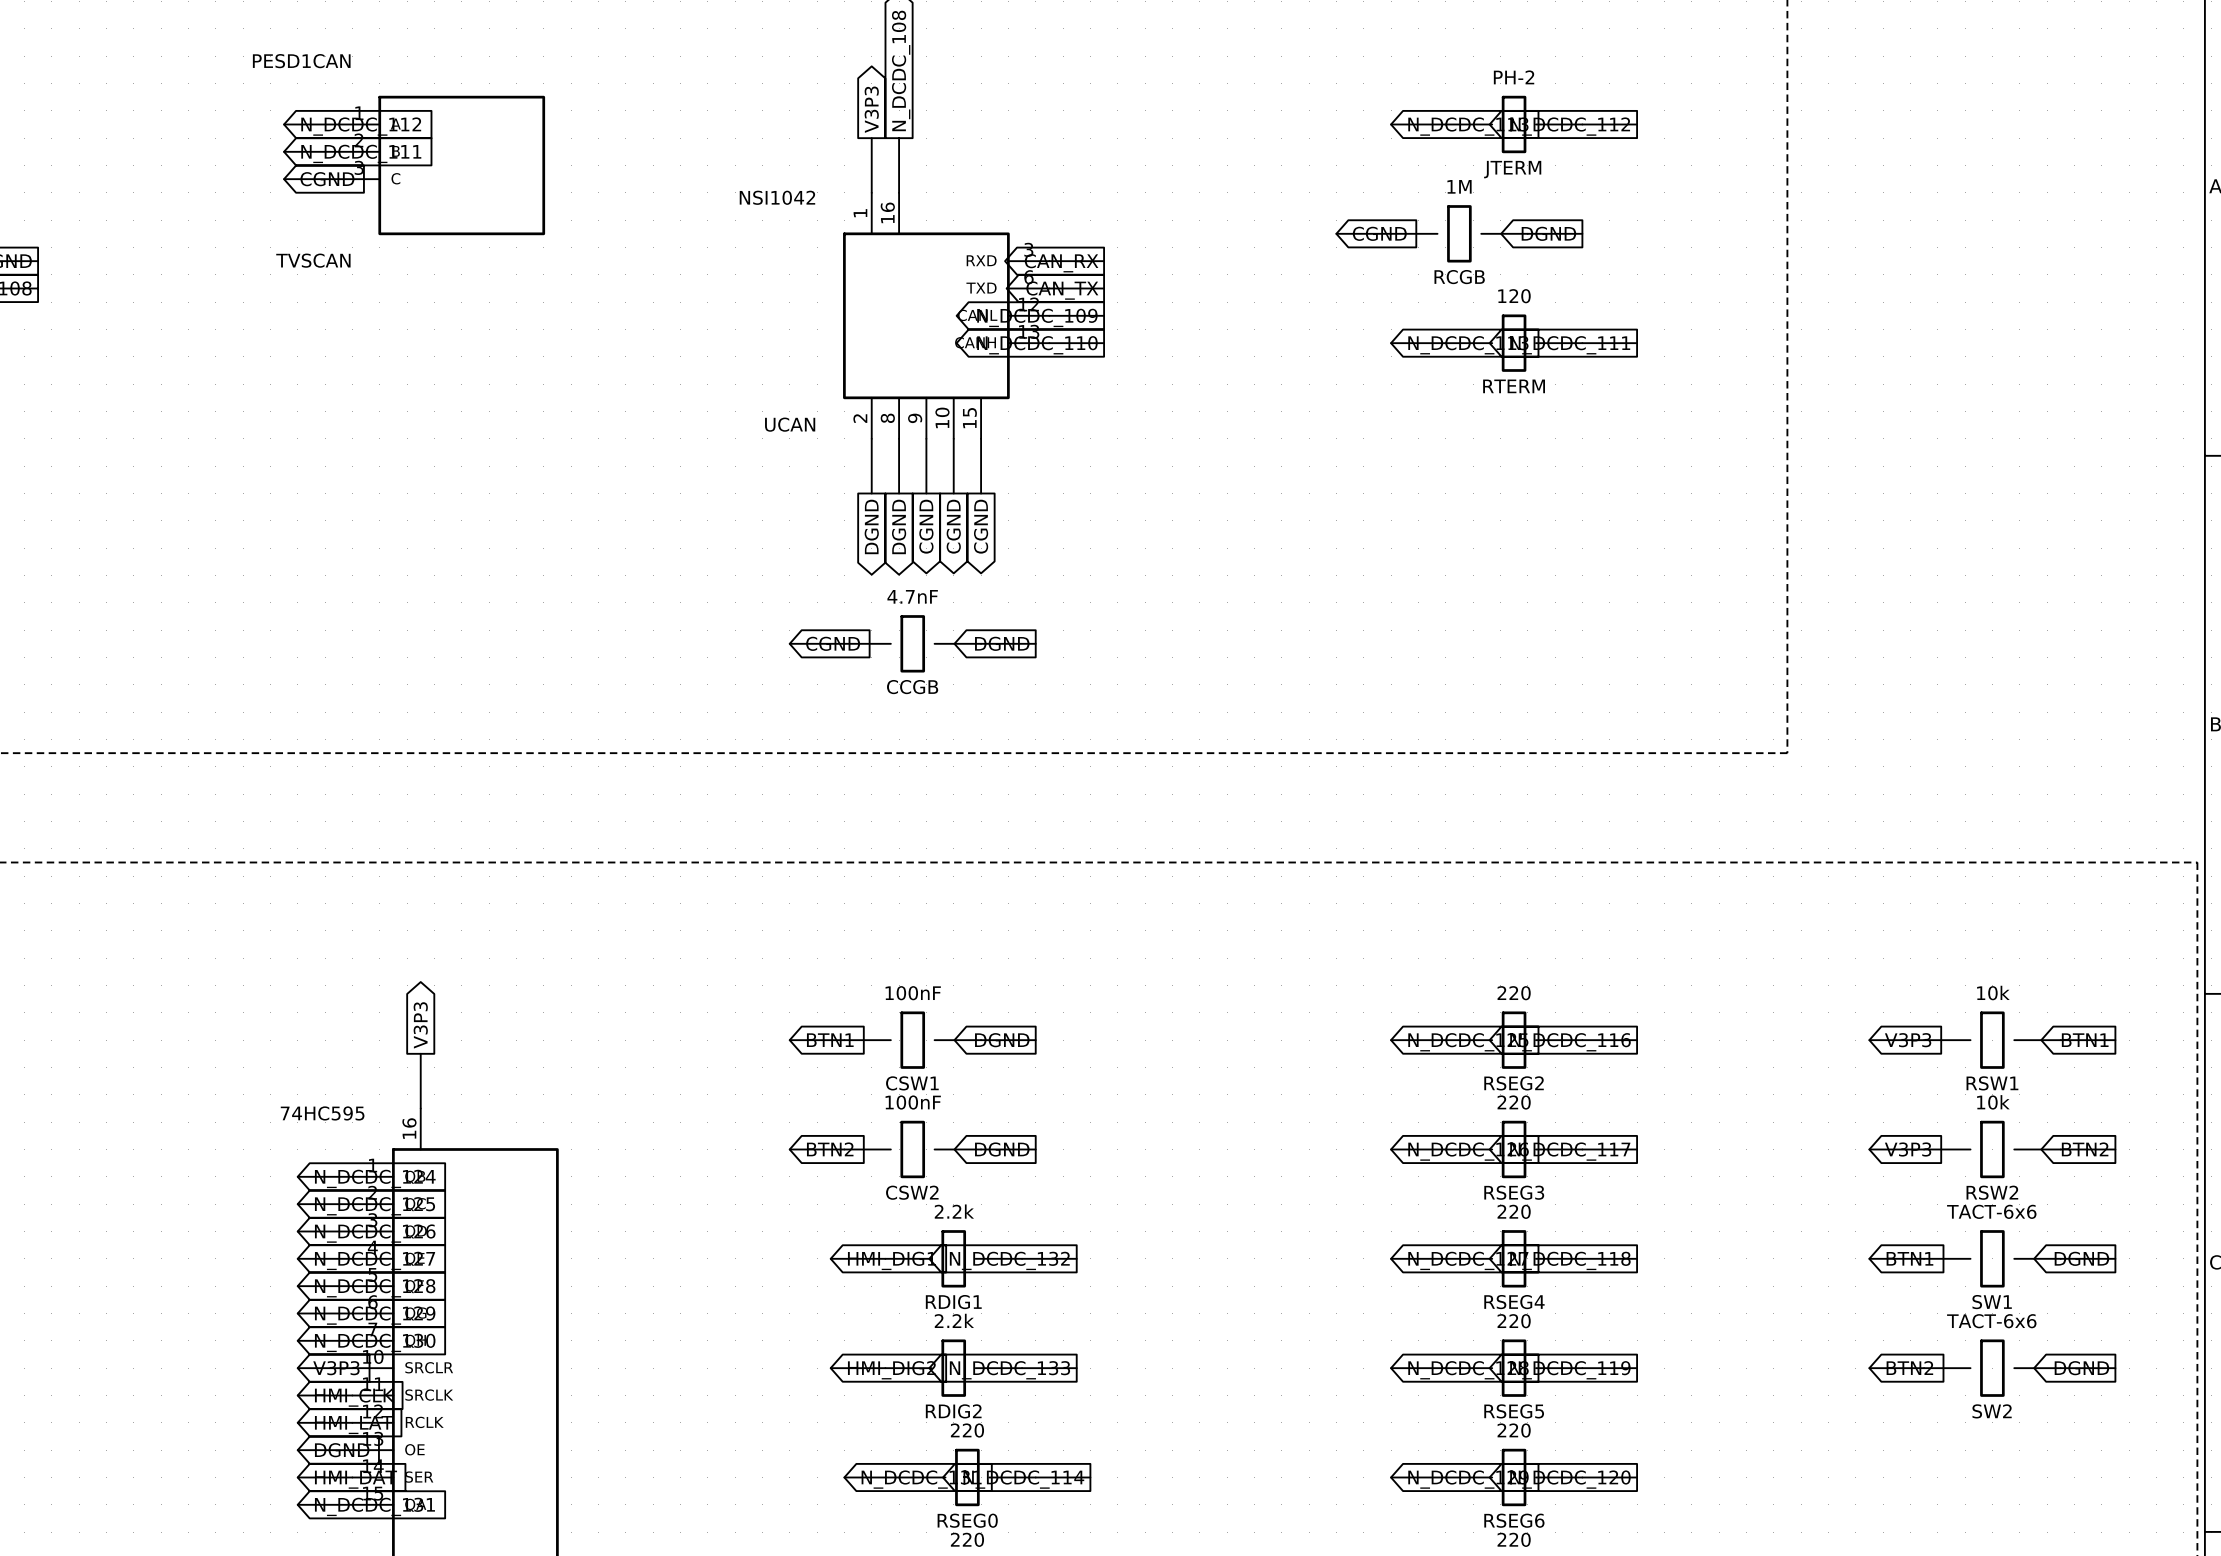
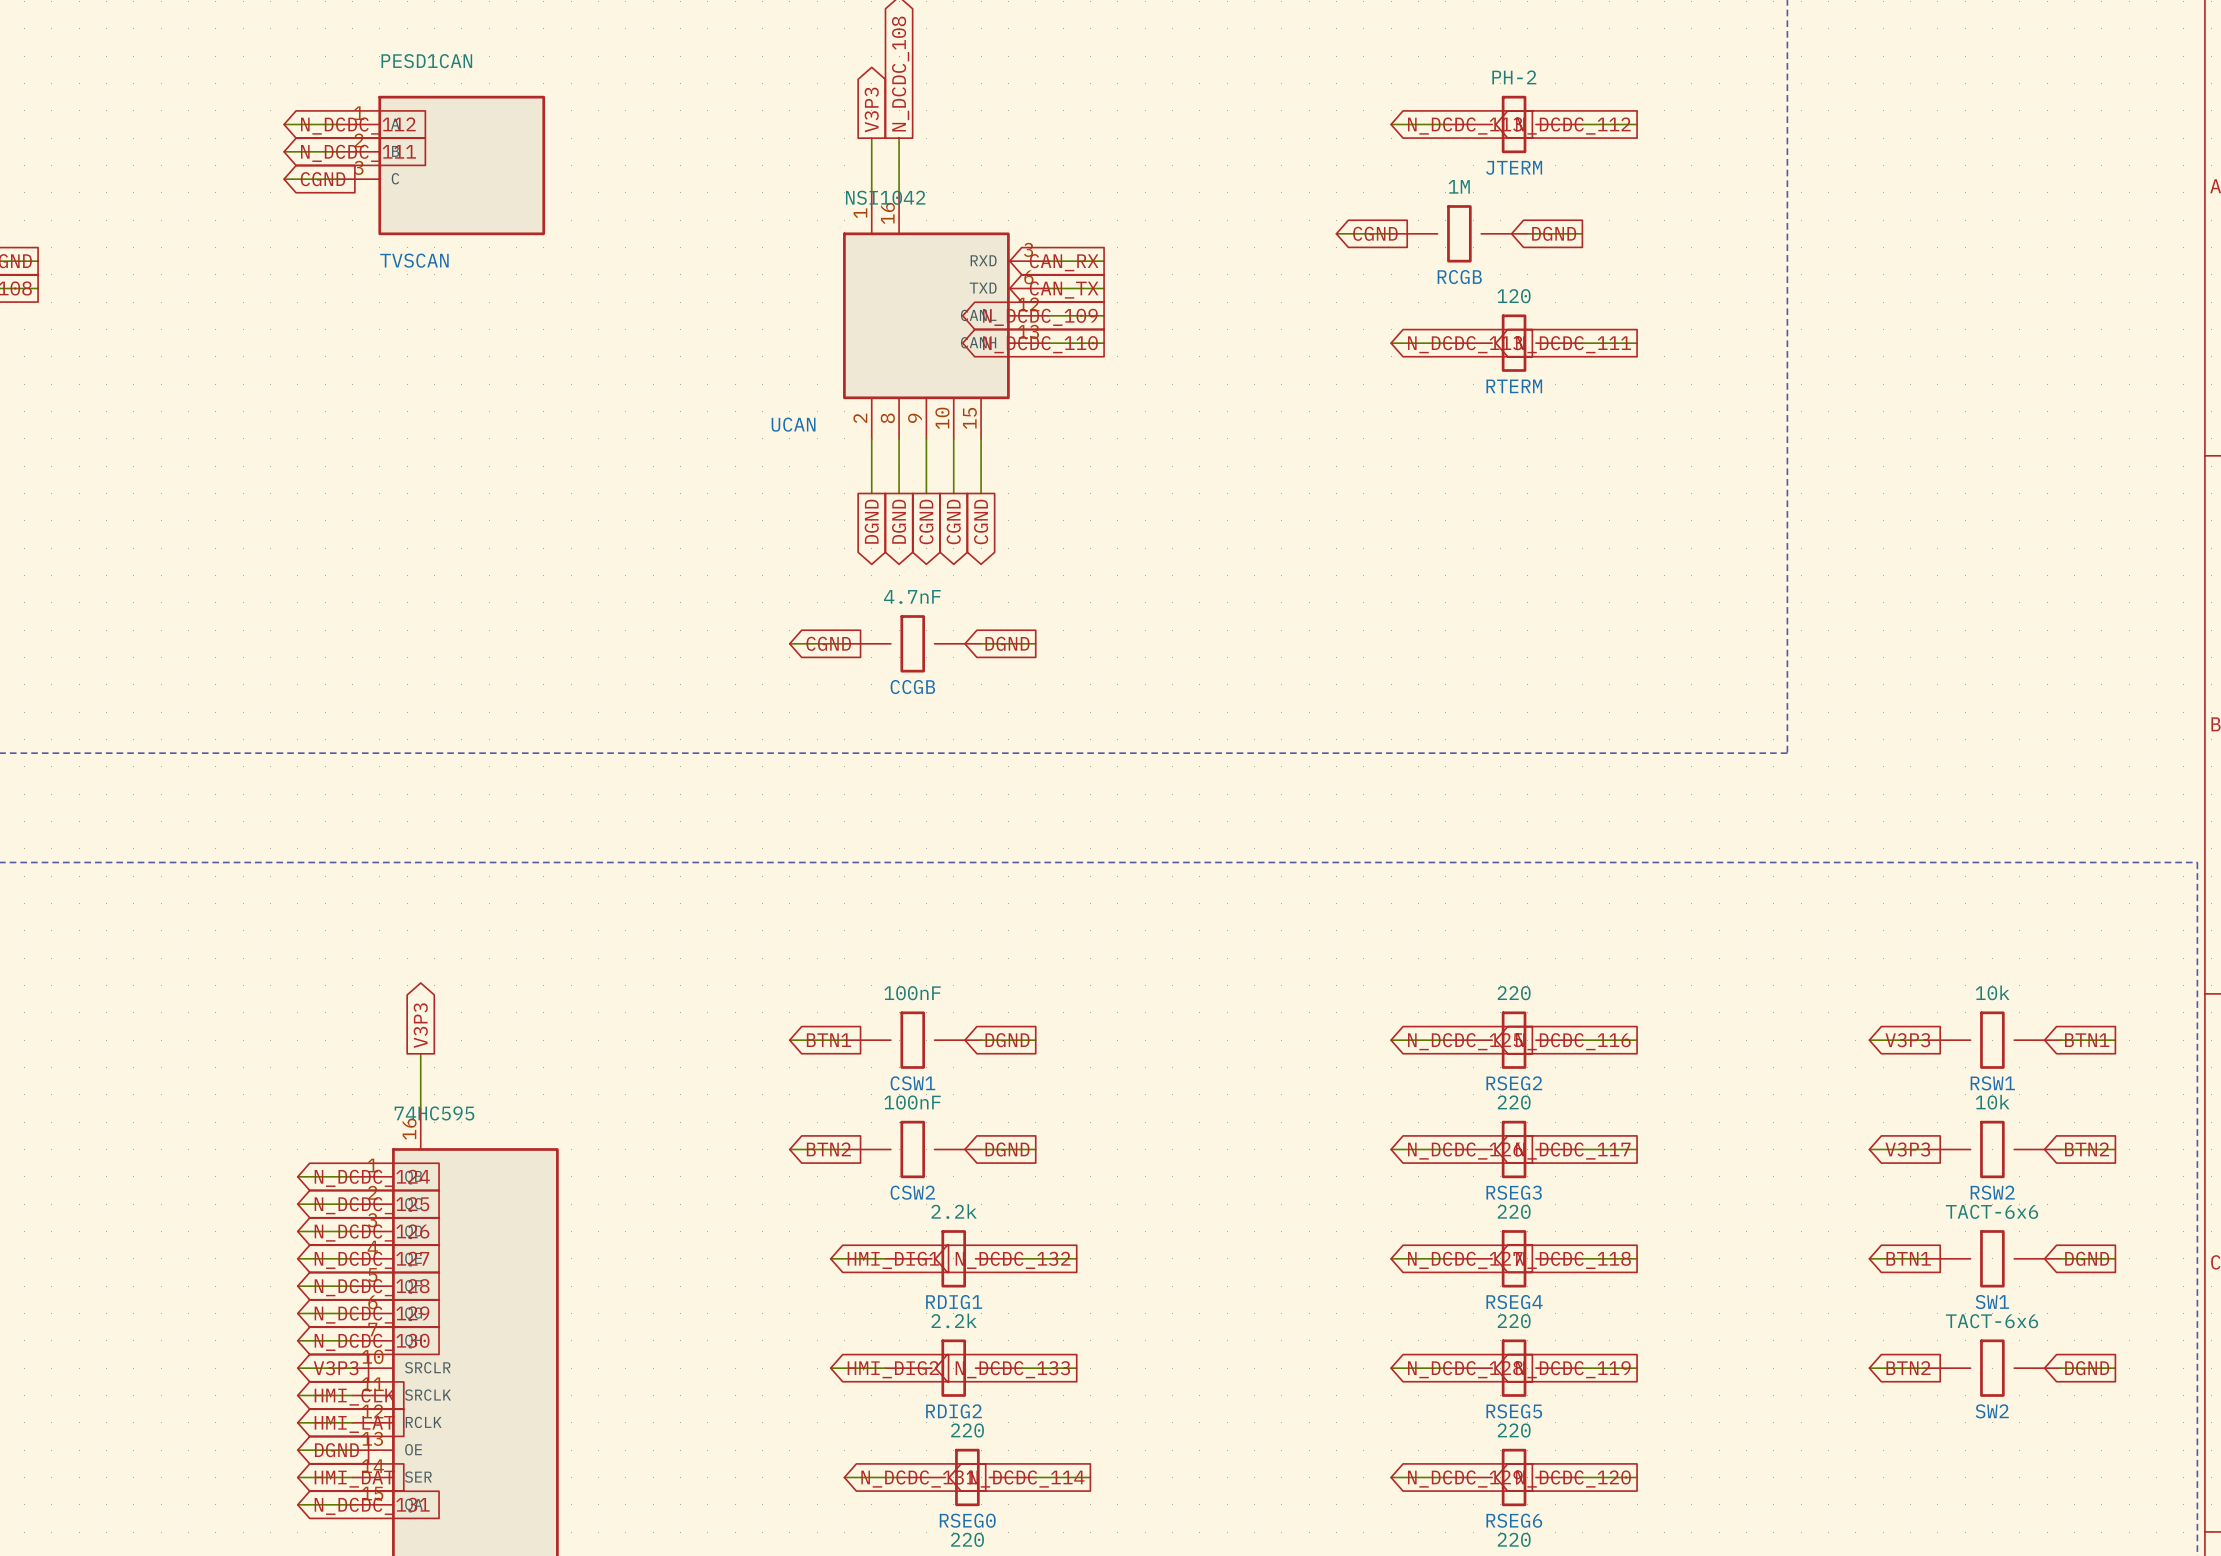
TVSCAN value position: PESD1CAN (301, 61) -> PESD1CAN (426, 61)
UCAN value position: NSI1042 (777, 197) -> NSI1042 (885, 197)
TVSCAN name position: TVSCAN (313, 260) -> TVSCAN (414, 260)
part value position: 74HC595 (322, 1113) -> 74HC595 (434, 1113)

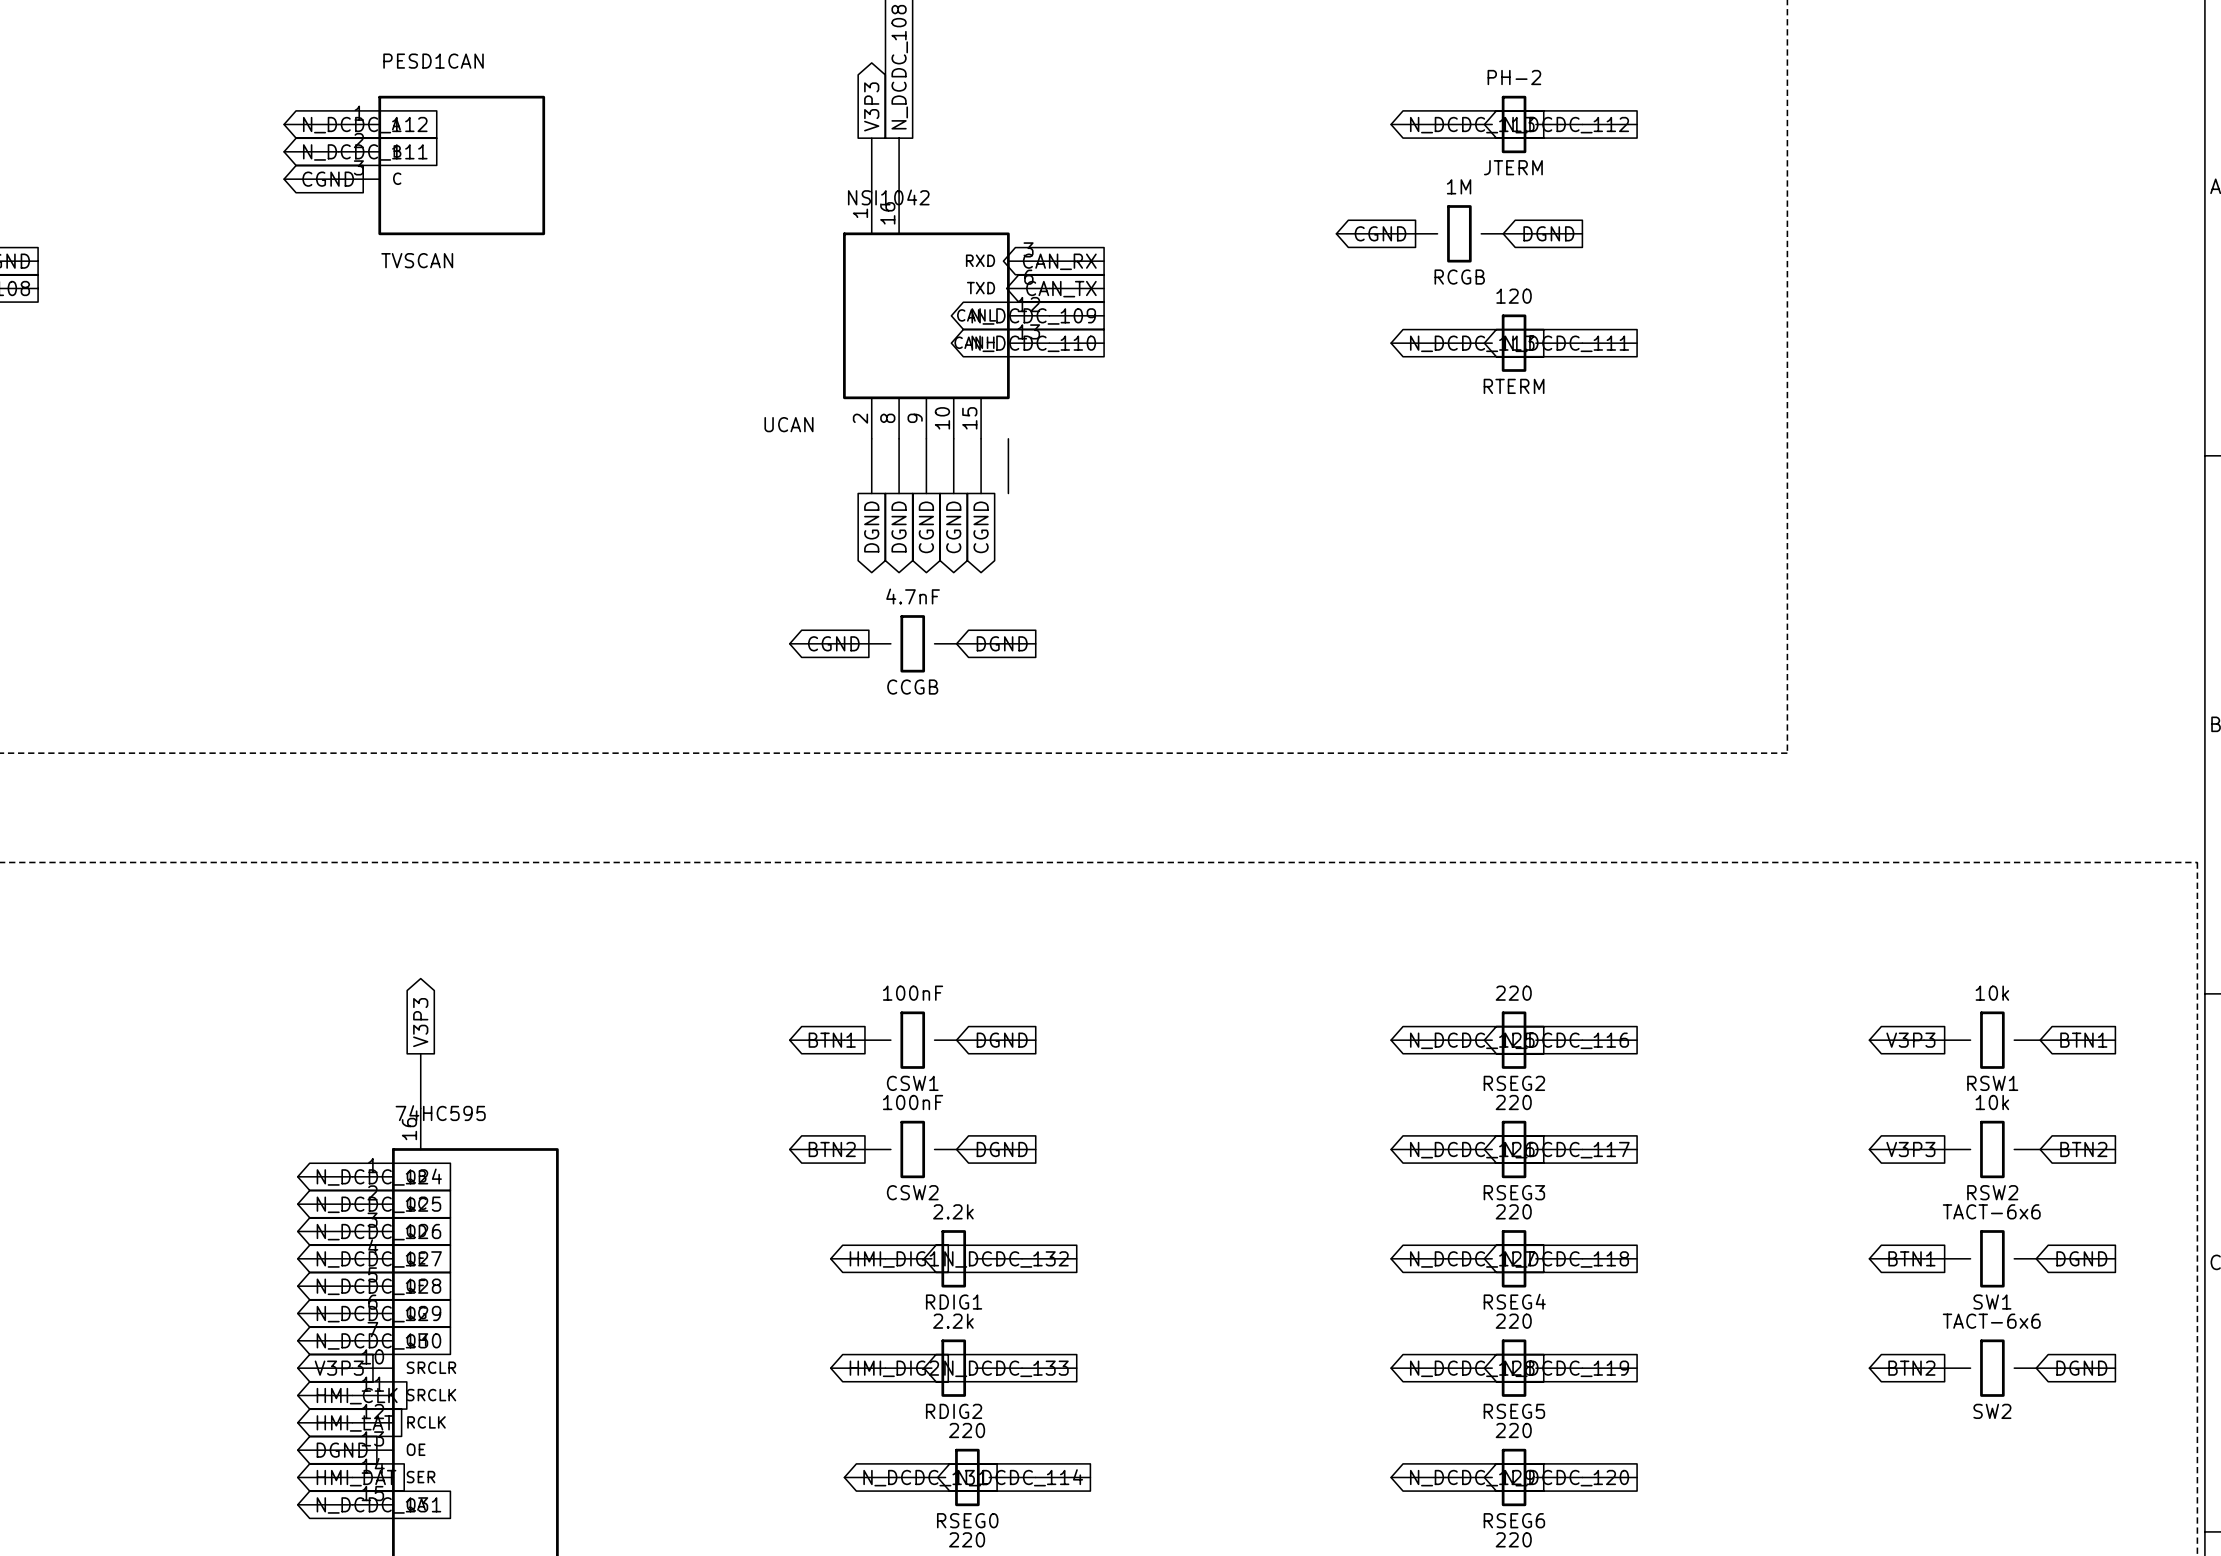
wire: none -> (1008, 438) (1008, 493)

